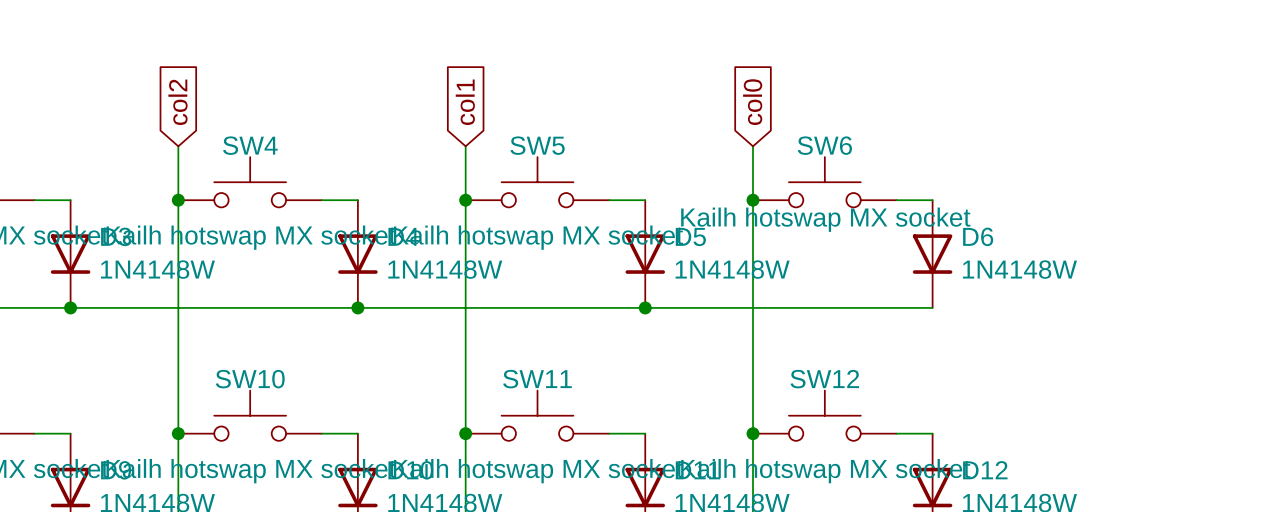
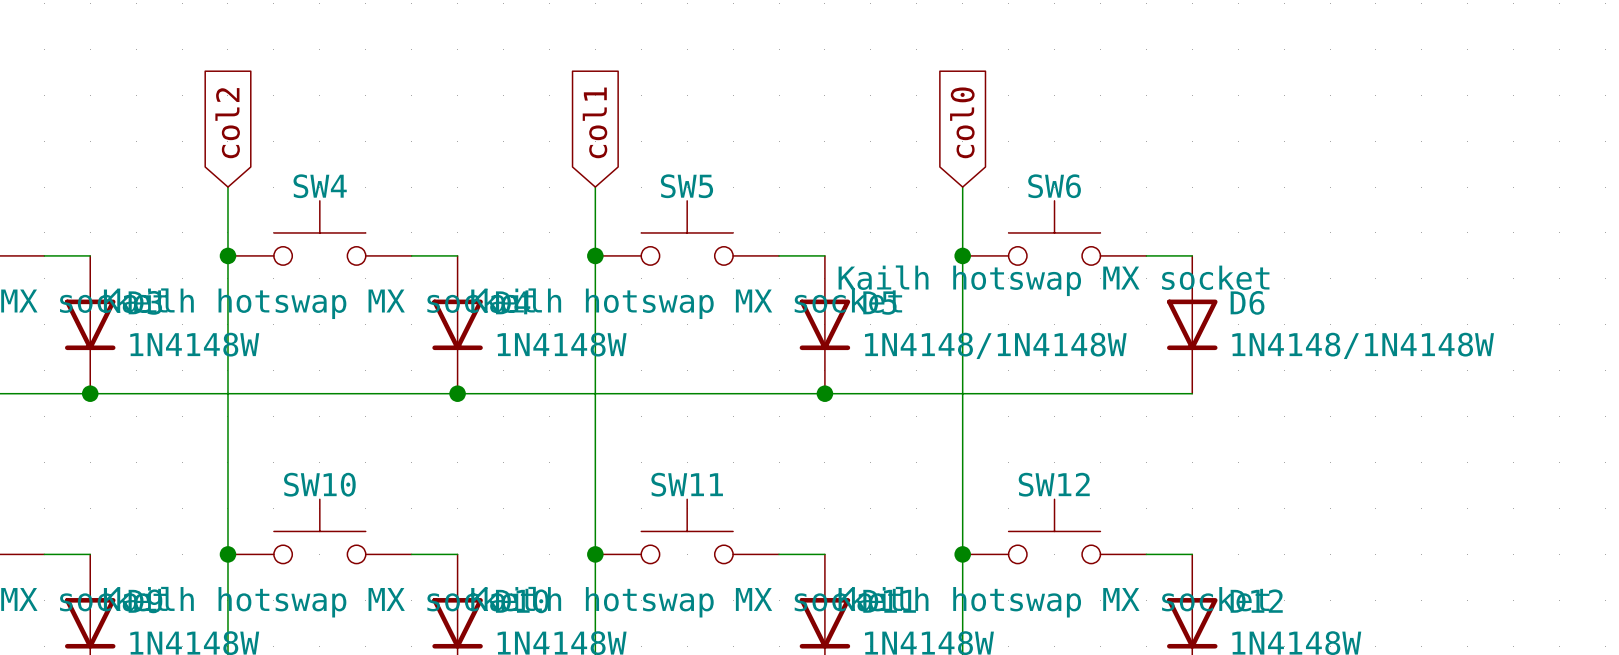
D5 value: 1N4148W (732, 269) -> 1N4148/1N4148W (995, 345)
D6 value: 1N4148W (1019, 269) -> 1N4148/1N4148W (1363, 345)

